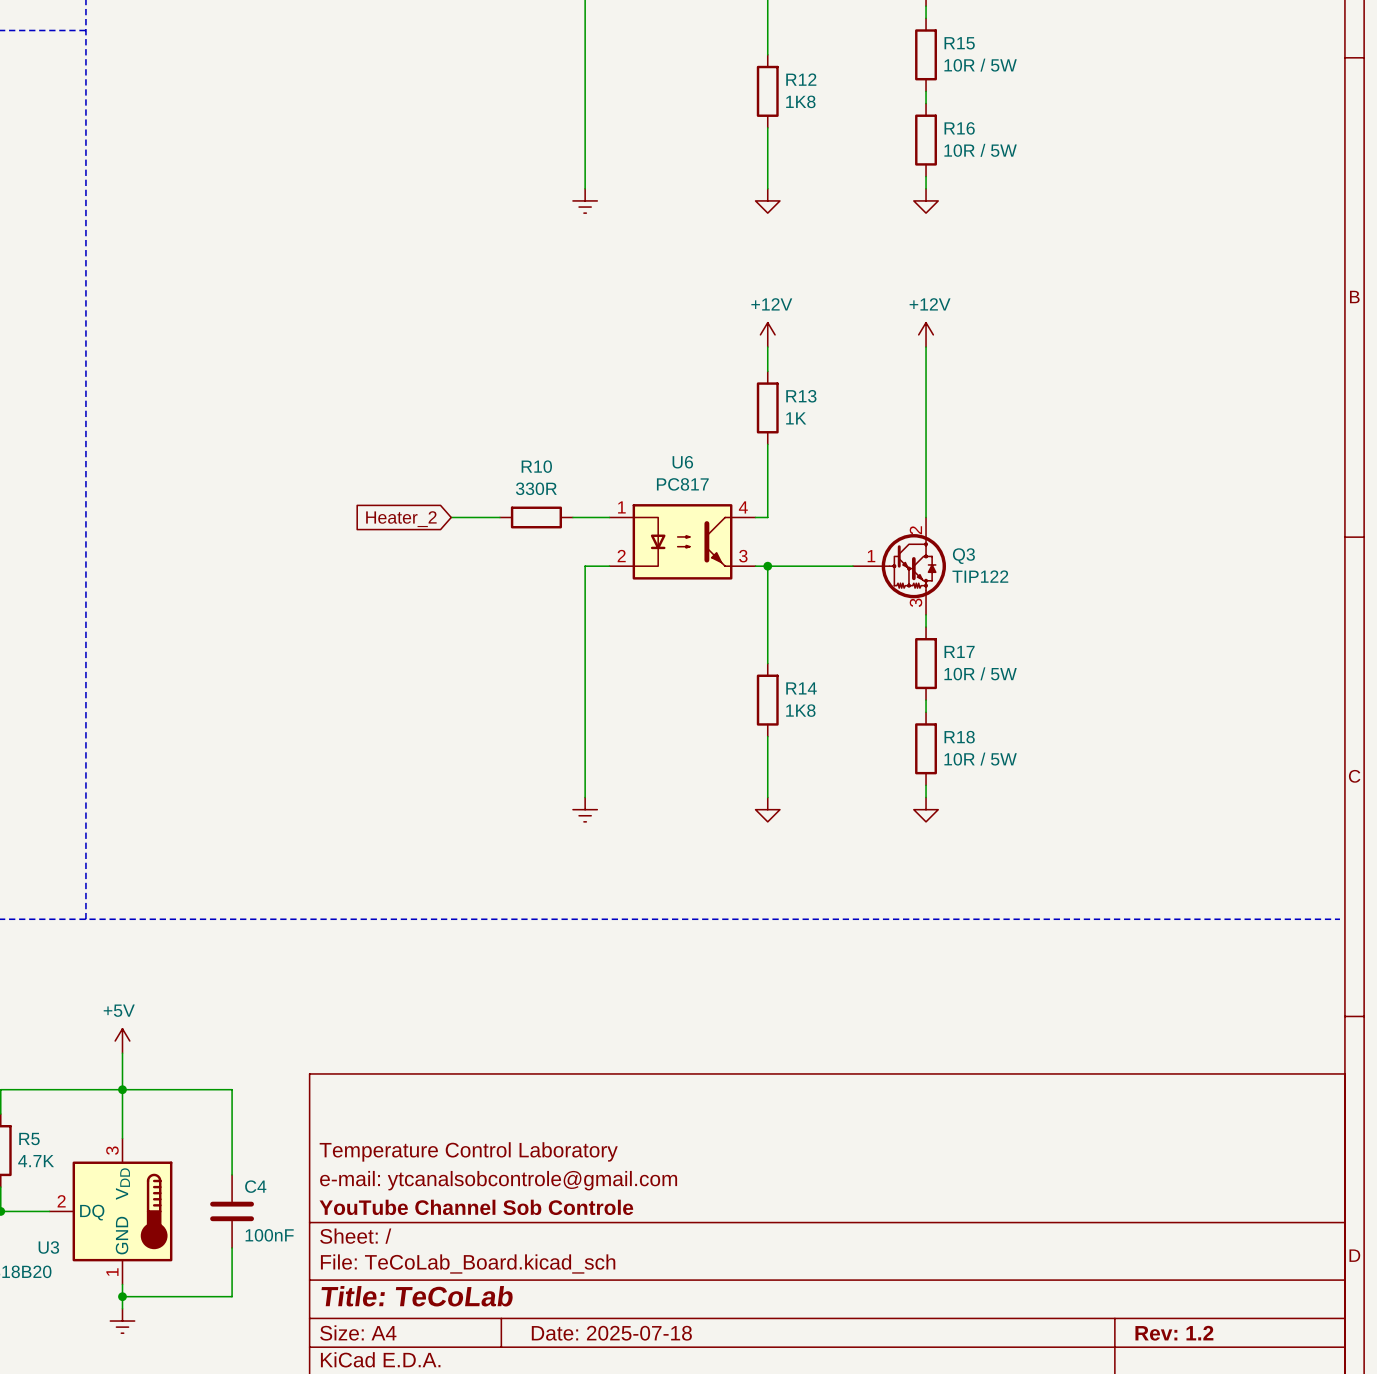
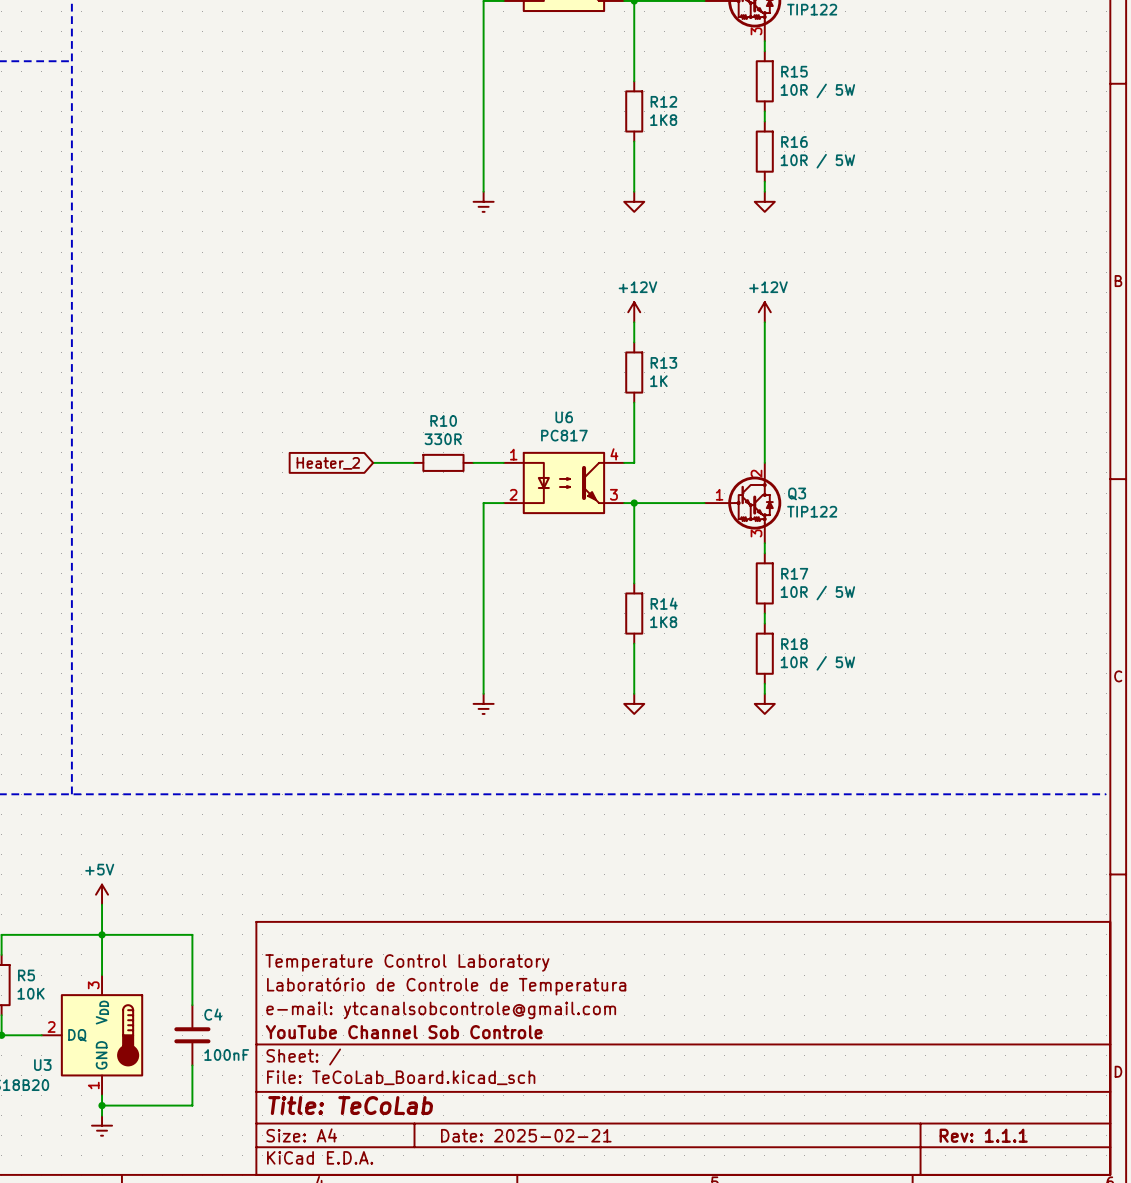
title block: none -> Temperature Control Laboratory (407, 962)
title block: Temperature Control Laboratory (468, 1151) -> Laboratório de Controle de Temperatura (446, 986)
R5 value: 4.7K (36, 1161) -> 10K (31, 993)
title block: Date: 2025-07-18 (611, 1333) -> Date: 2025-02-21 (526, 1135)
title block: Rev: 1.2 (1174, 1333) -> Rev: 1.1.1 (983, 1135)

